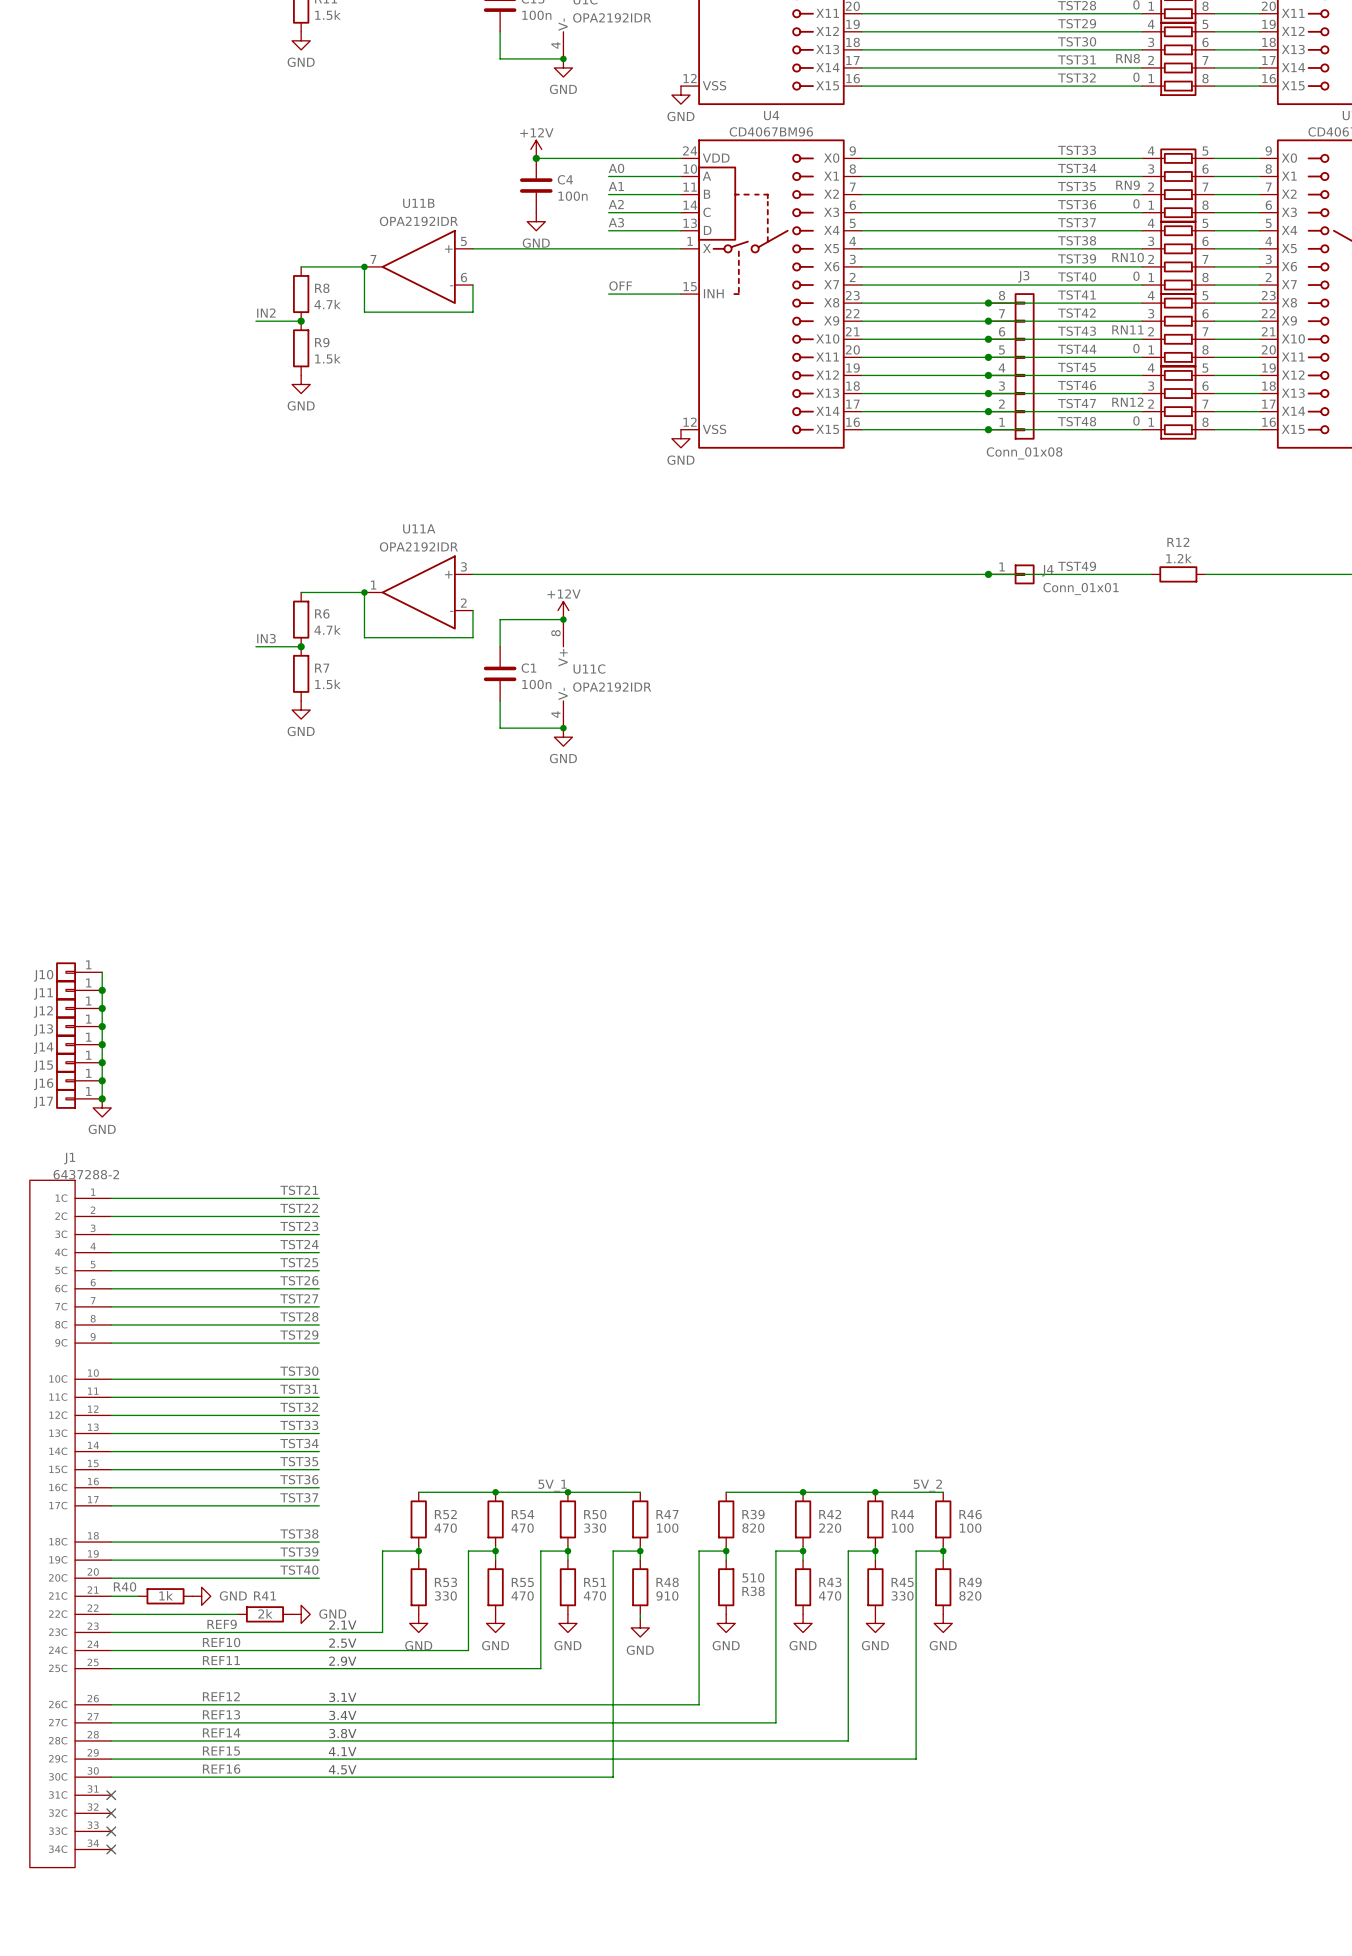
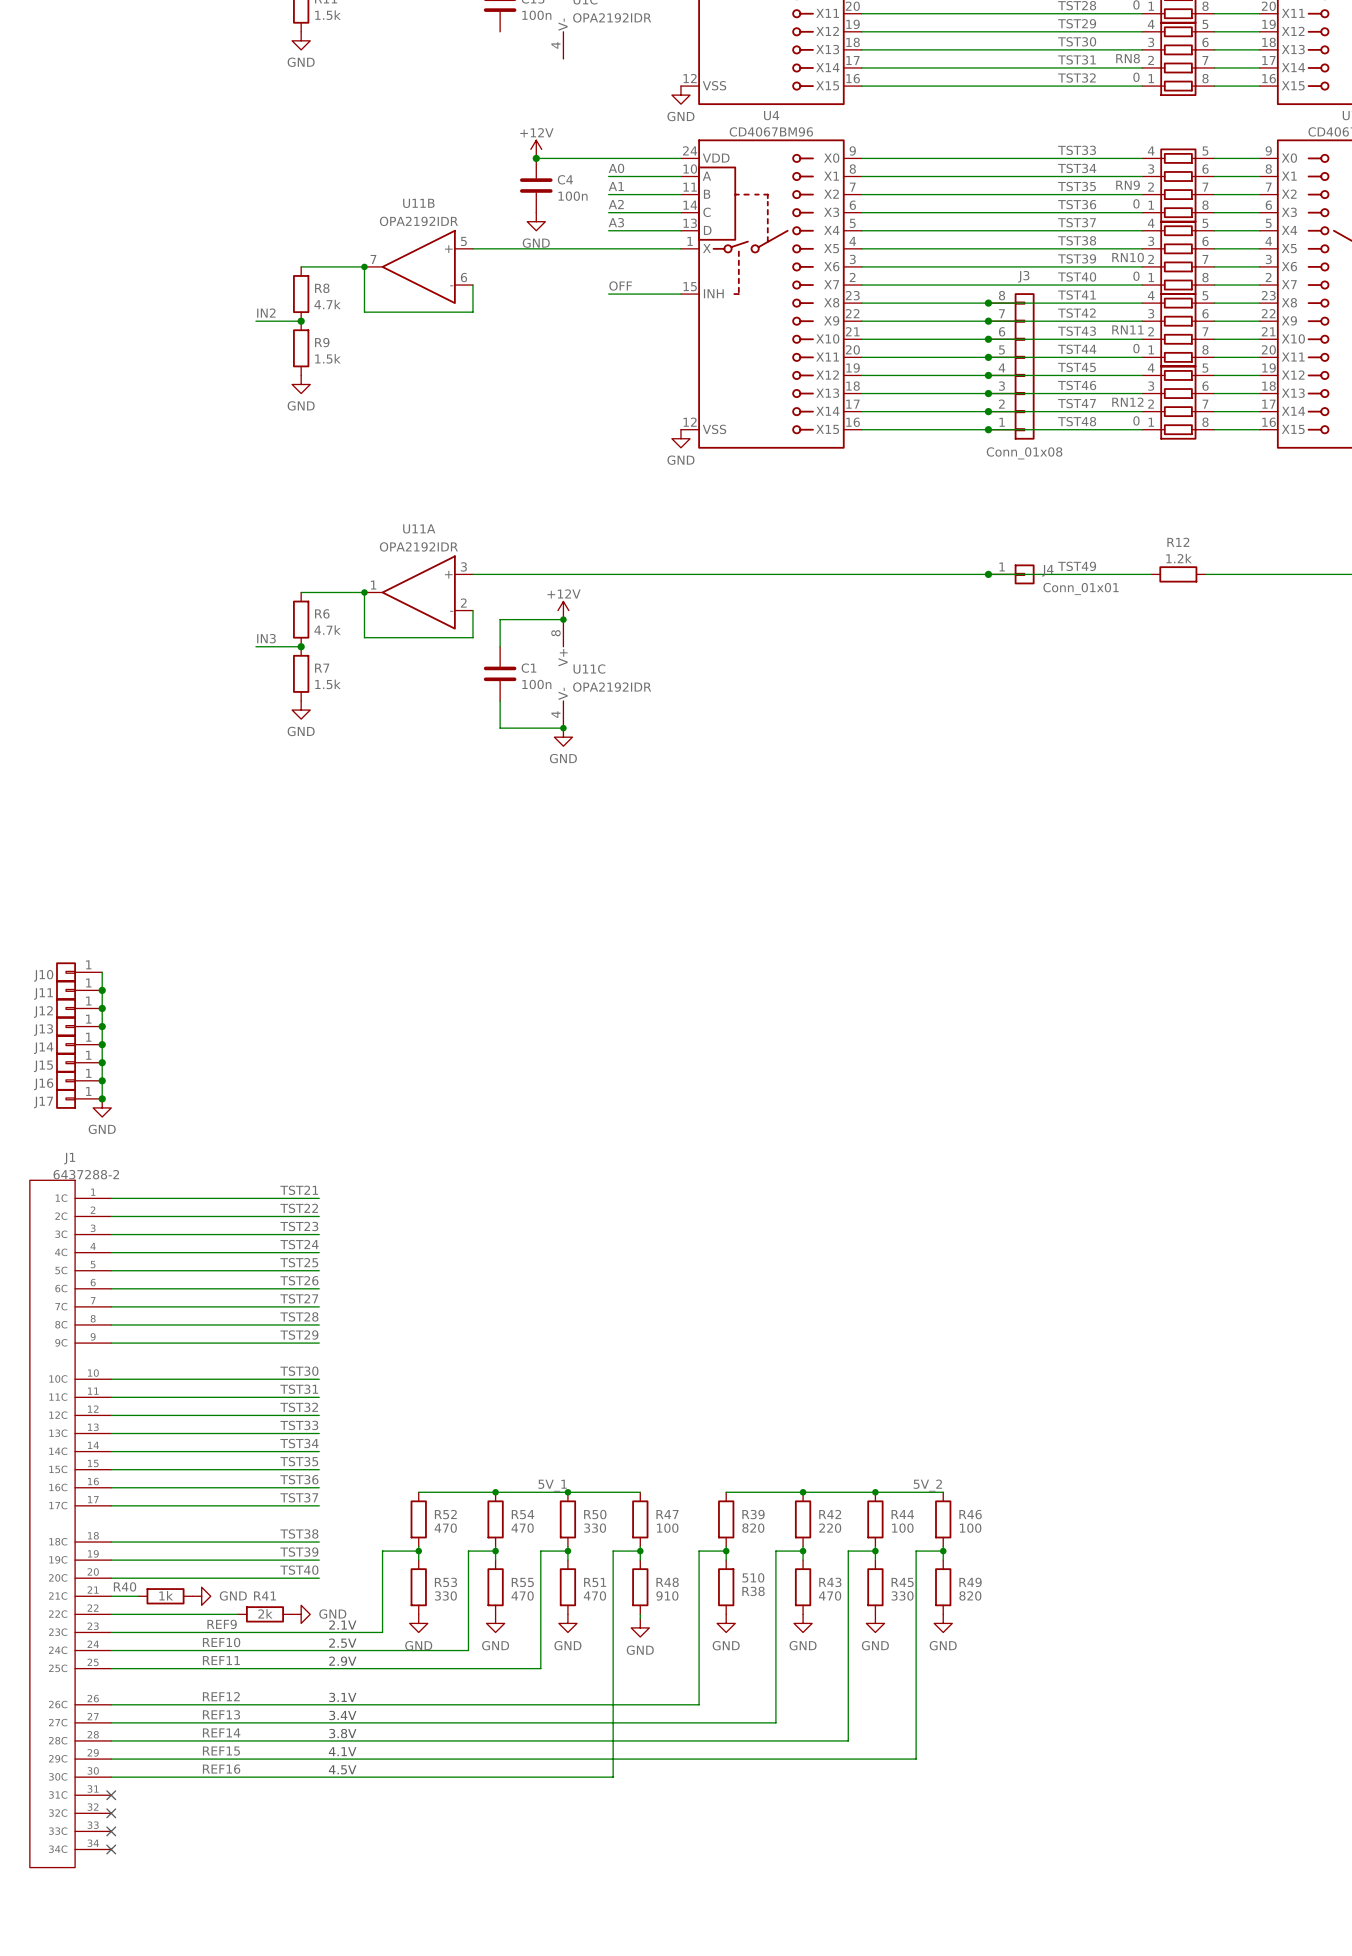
wire: (500, 31) (500, 58) (563, 58) -> none
junction: (563, 58) -> none
power symbol: GND (563, 67) -> none

